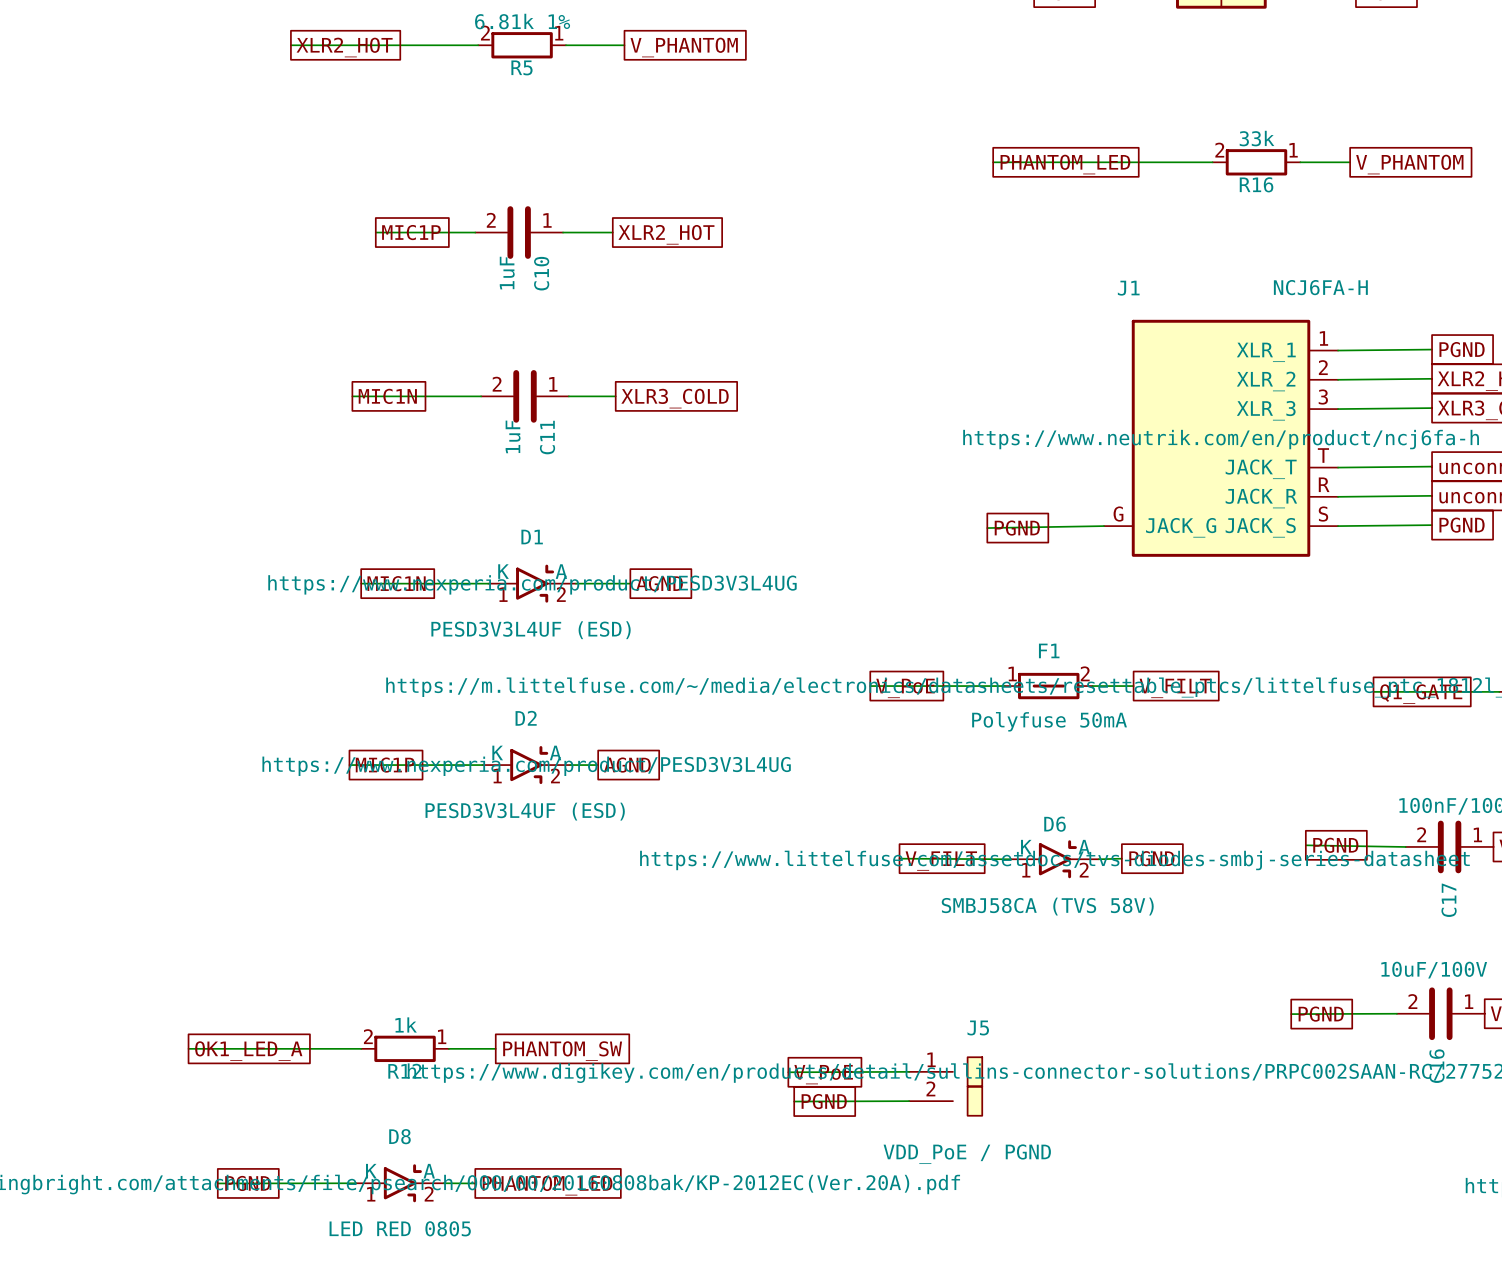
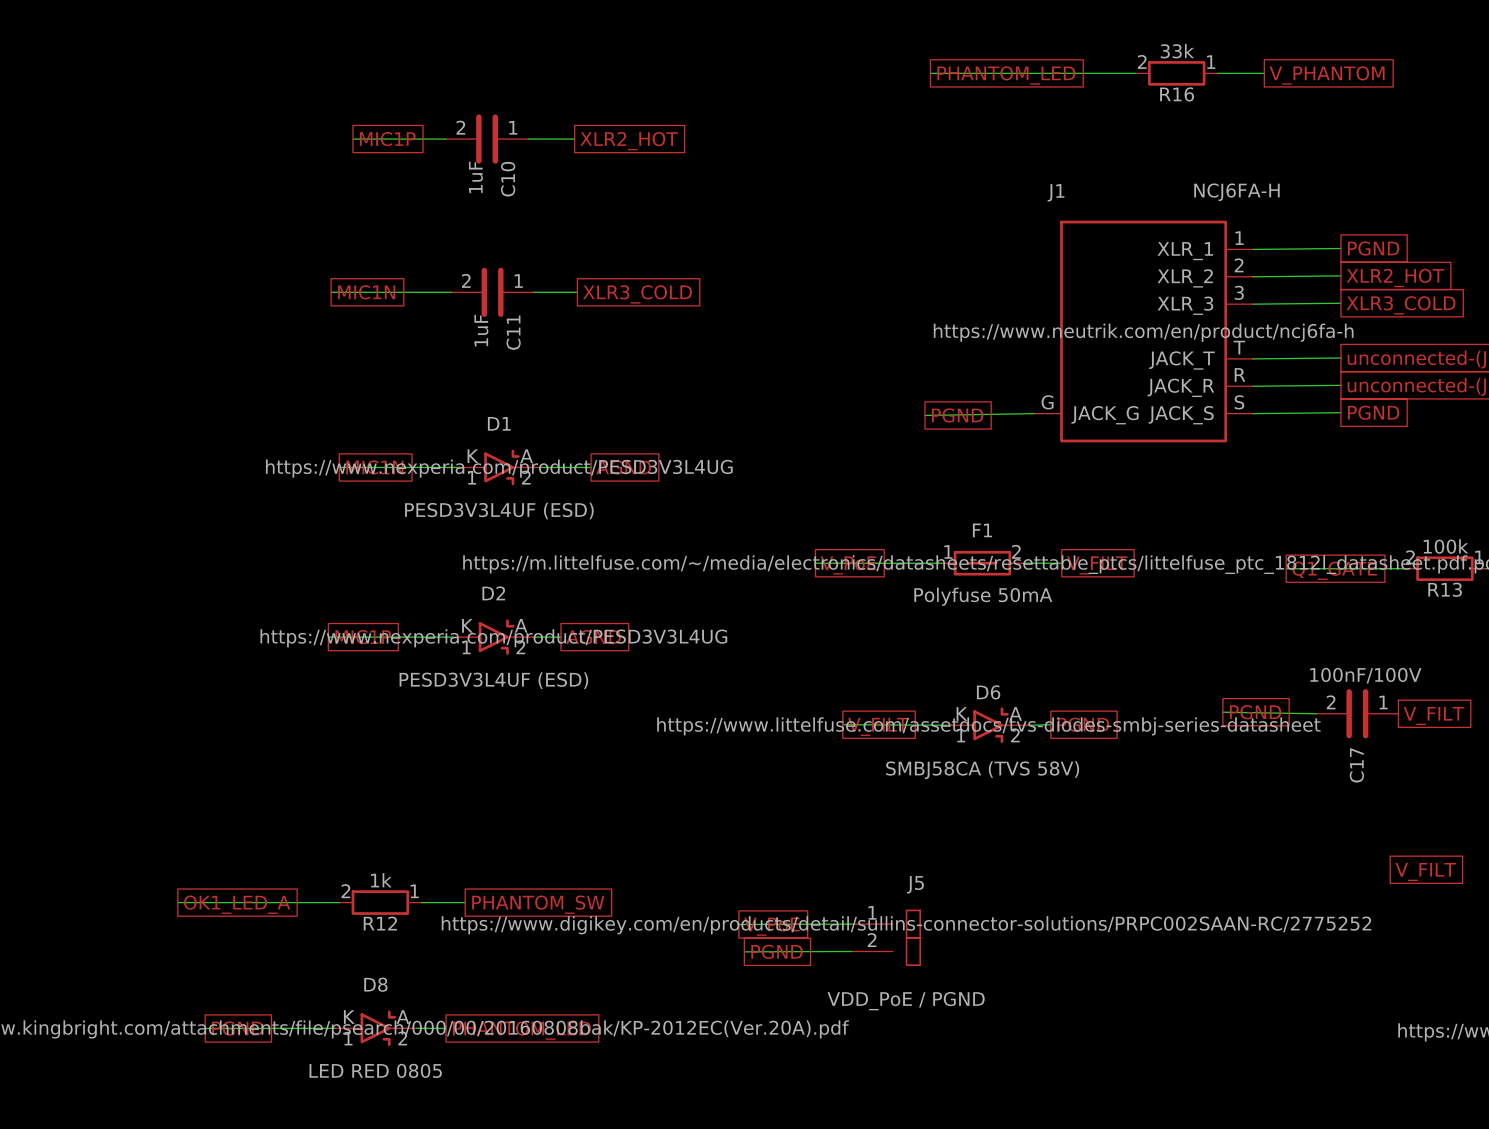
wire: (1396, 1013) (1291, 1014) -> none
C16: 10uF/100V (1440, 1013) -> none
global label: PGND (1321, 1014) -> none

